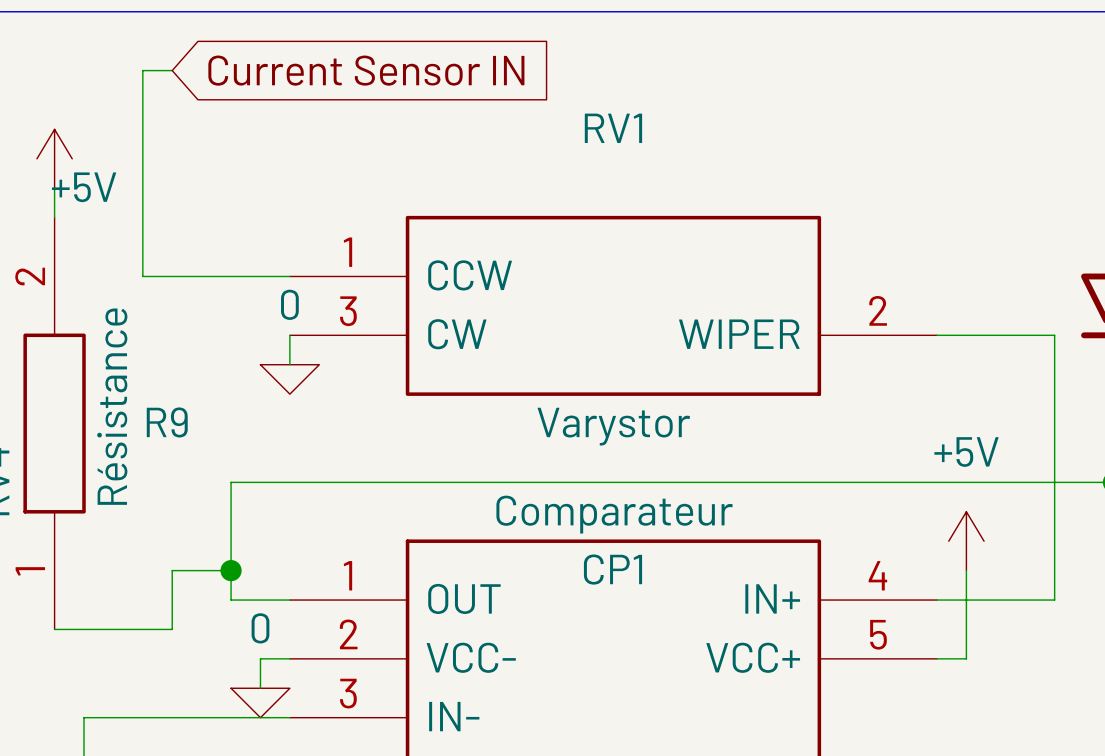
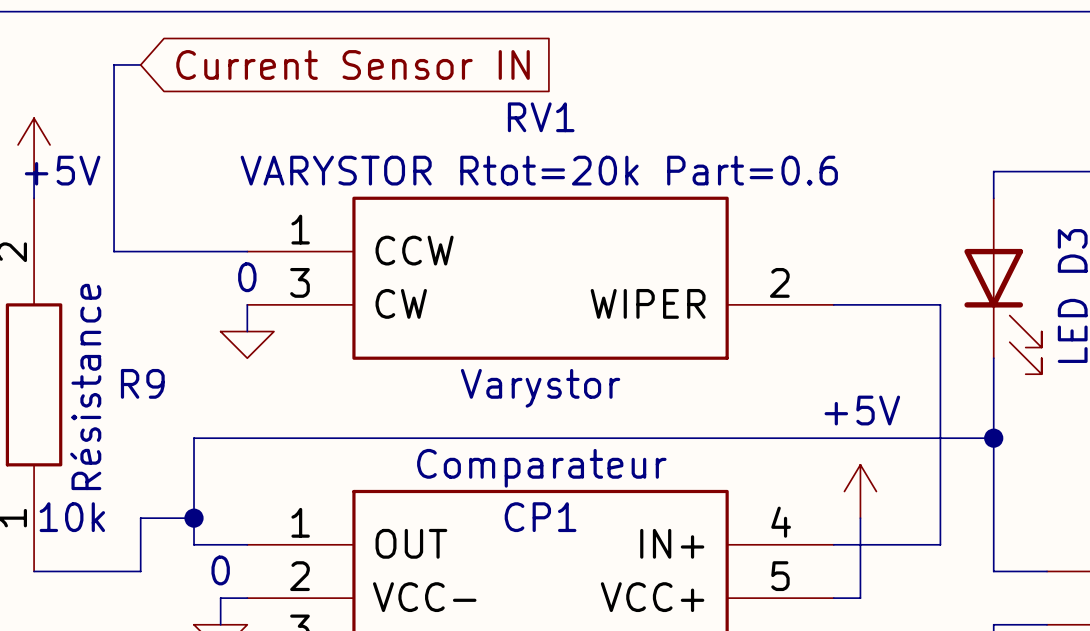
RV1 text: none -> VARYSTOR Rtot=20k Part=0.6 (539, 170)
R9 text: none -> 10k (72, 517)

